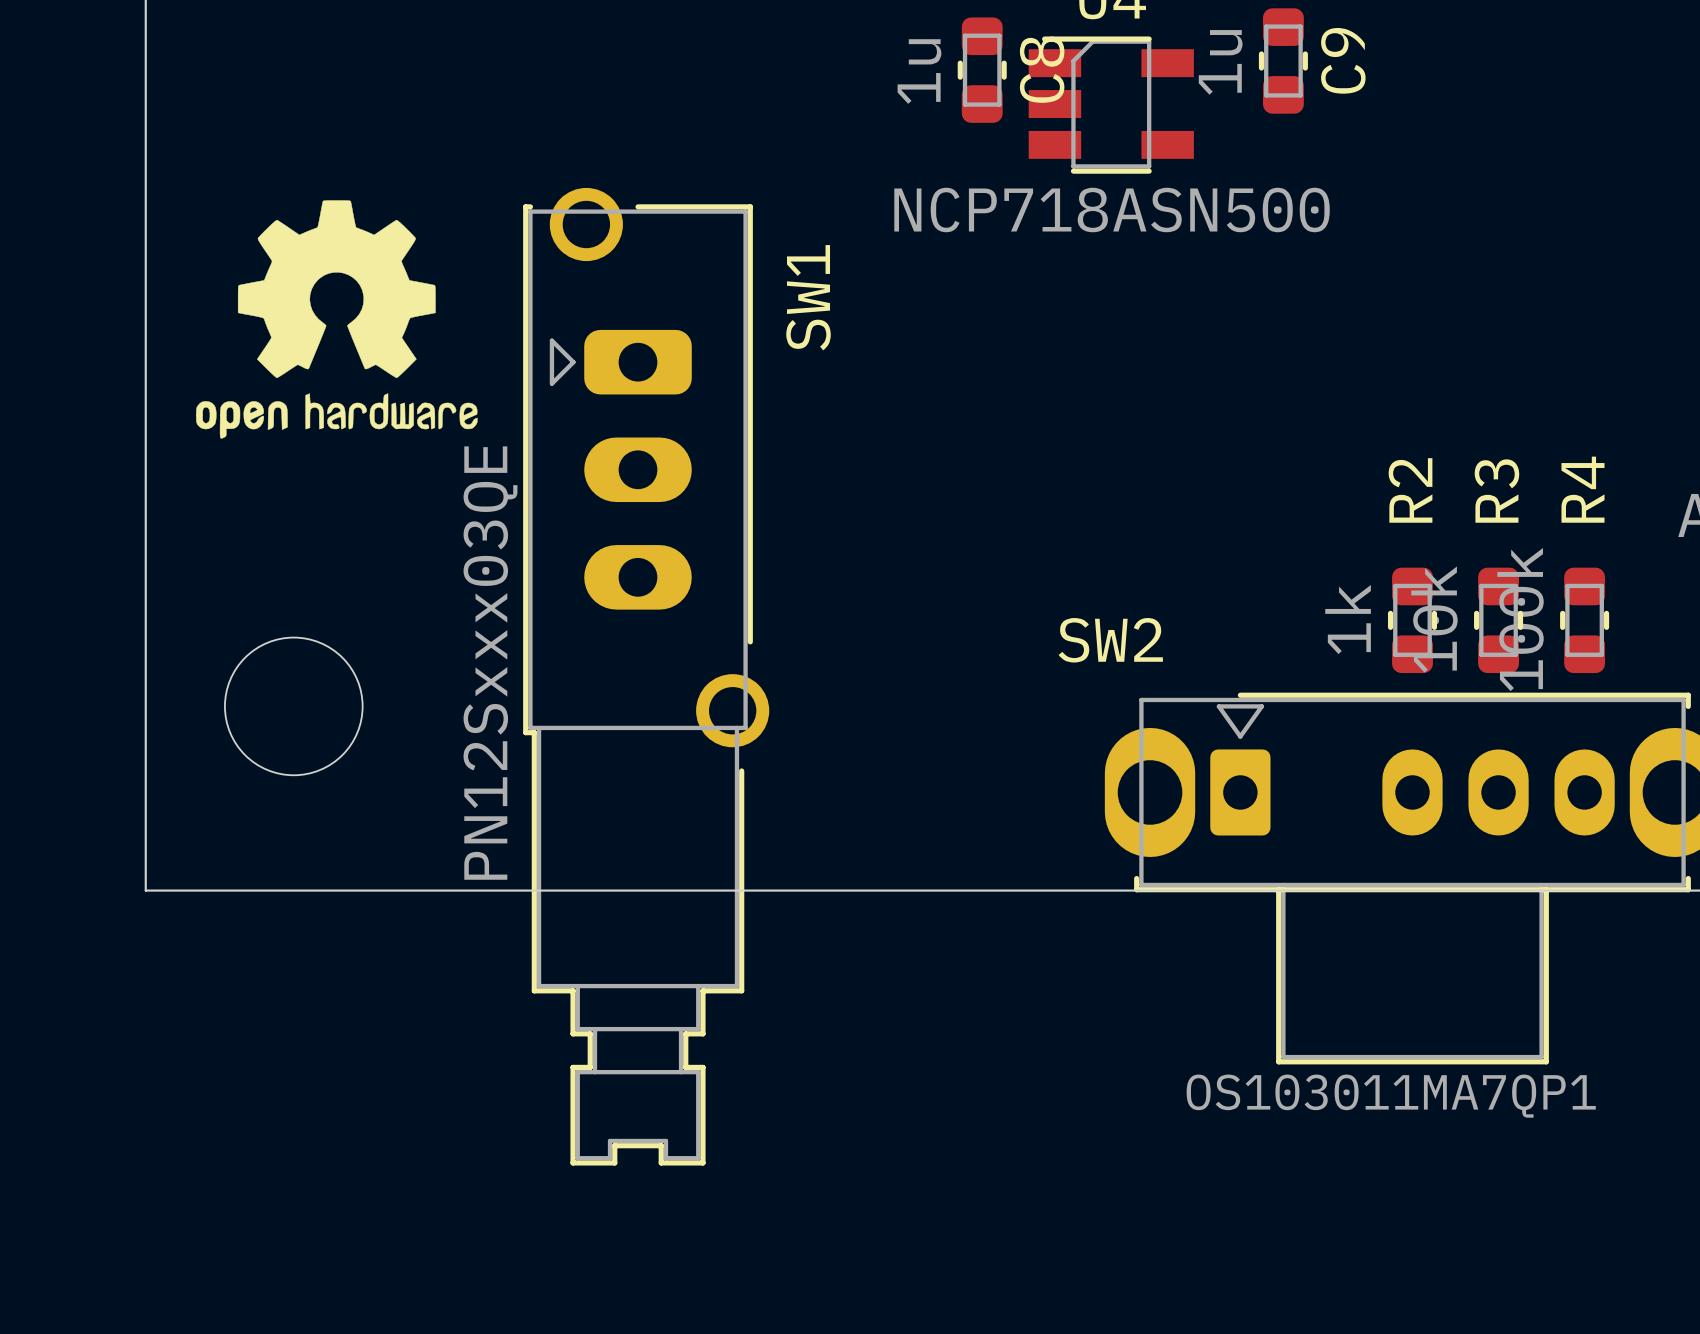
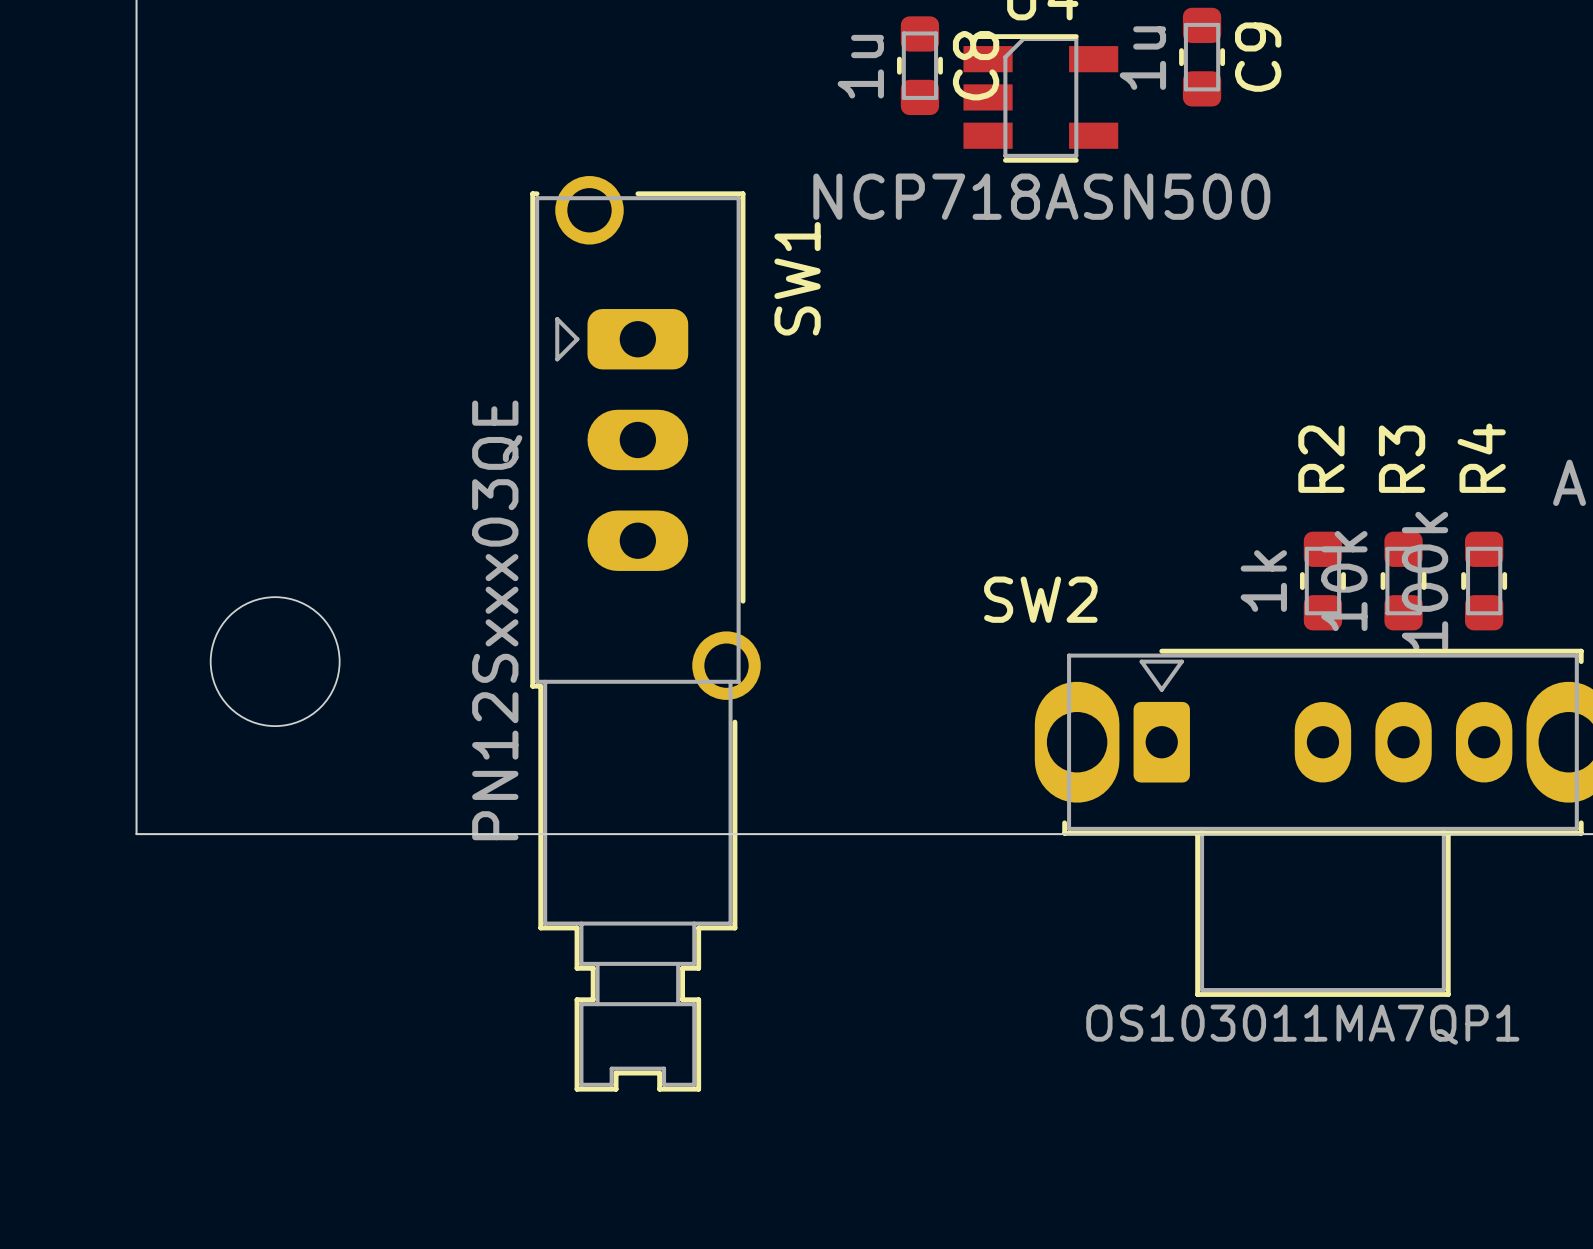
drawing: [196, 200, 478, 439] -> none
SW1 position: (646, 676) -> (645, 633)

